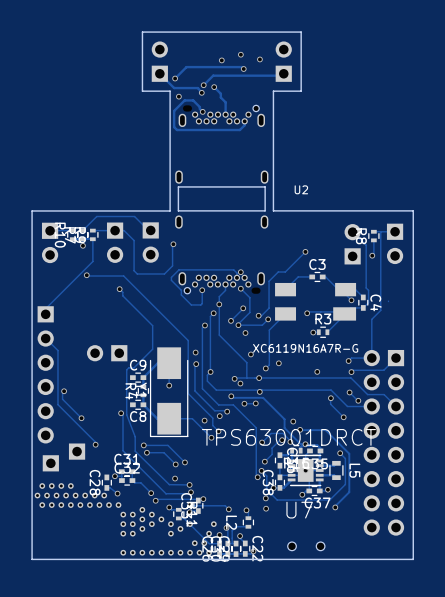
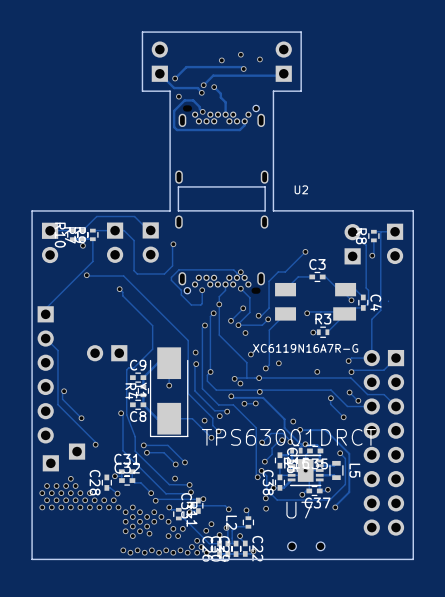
via: none -> (70, 478)
part: (42, 486) -> none
via: none -> (47, 486)
part: (51, 486) -> none
via: none -> (56, 486)
part: (61, 486) -> none
via: none -> (66, 486)
part: (70, 486) -> none
via: none -> (75, 486)
via: none -> (42, 493)
via: none -> (51, 493)
via: none -> (61, 493)
via: none -> (70, 493)
via: none -> (80, 493)
via: none -> (89, 493)
part: (37, 495) -> none
part: (47, 495) -> none
part: (56, 495) -> none
part: (66, 495) -> none
part: (75, 495) -> none
part: (85, 495) -> none
part: (94, 495) -> none
part: (104, 495) -> none
via: none -> (47, 500)
via: none -> (56, 500)
via: none -> (66, 500)
via: none -> (75, 500)
via: none -> (85, 500)
via: none -> (94, 500)
via: none -> (104, 500)
via: none -> (113, 500)
part: (42, 505) -> none
part: (51, 505) -> none
part: (61, 505) -> none
part: (70, 505) -> none
part: (80, 505) -> none
part: (89, 505) -> none
part: (99, 505) -> none
part: (108, 505) -> none
part: (118, 505) -> none
via: none -> (42, 507)
via: none -> (51, 507)
via: none -> (61, 507)
via: none -> (70, 507)
via: none -> (80, 507)
via: none -> (89, 507)
via: none -> (99, 507)
via: none -> (108, 507)
via: none -> (118, 507)
via: none -> (132, 507)
part: (142, 509) -> none
via: none -> (125, 512)
via: none -> (139, 512)
via: none -> (154, 512)
part: (123, 514) -> none
part: (132, 514) -> none
part: (151, 514) -> none
via: none -> (132, 516)
via: none -> (147, 516)
via: none -> (161, 516)
part: (142, 519) -> none
part: (161, 519) -> none
via: none -> (125, 521)
via: none -> (139, 521)
via: none -> (154, 521)
via: none -> (168, 521)
part: (123, 524) -> none
part: (132, 524) -> none
part: (151, 524) -> none
part: (170, 524) -> none
part: (190, 524) -> none
via: none -> (211, 524)
part: (213, 524) -> none
via: none -> (132, 526)
via: none -> (147, 526)
part: (142, 528) -> none
via: none -> (173, 528)
part: (180, 528) -> none
via: none -> (182, 528)
via: none -> (206, 530)
via: none -> (125, 531)
via: none -> (139, 531)
part: (123, 533) -> none
part: (132, 533) -> none
via: none -> (149, 533)
part: (170, 533) -> none
part: (209, 533) -> none
via: none -> (132, 536)
via: none -> (168, 536)
via: none -> (178, 536)
via: none -> (197, 540)
part: (194, 543) -> none
part: (204, 543) -> none
via: none -> (191, 547)
via: none -> (201, 547)
via: none -> (123, 550)
via: none -> (137, 550)
via: none -> (151, 550)
via: none -> (166, 550)
via: none -> (180, 550)
part: (123, 552) -> none
via: none -> (130, 552)
part: (132, 552) -> none
part: (142, 552) -> none
via: none -> (144, 552)
part: (151, 552) -> none
via: none -> (159, 552)
part: (161, 552) -> none
part: (170, 552) -> none
via: none -> (173, 552)
part: (180, 552) -> none
via: none -> (187, 552)
part: (190, 552) -> none
via: none -> (197, 552)
part: (199, 552) -> none
via: none -> (206, 552)
part: (209, 552) -> none

